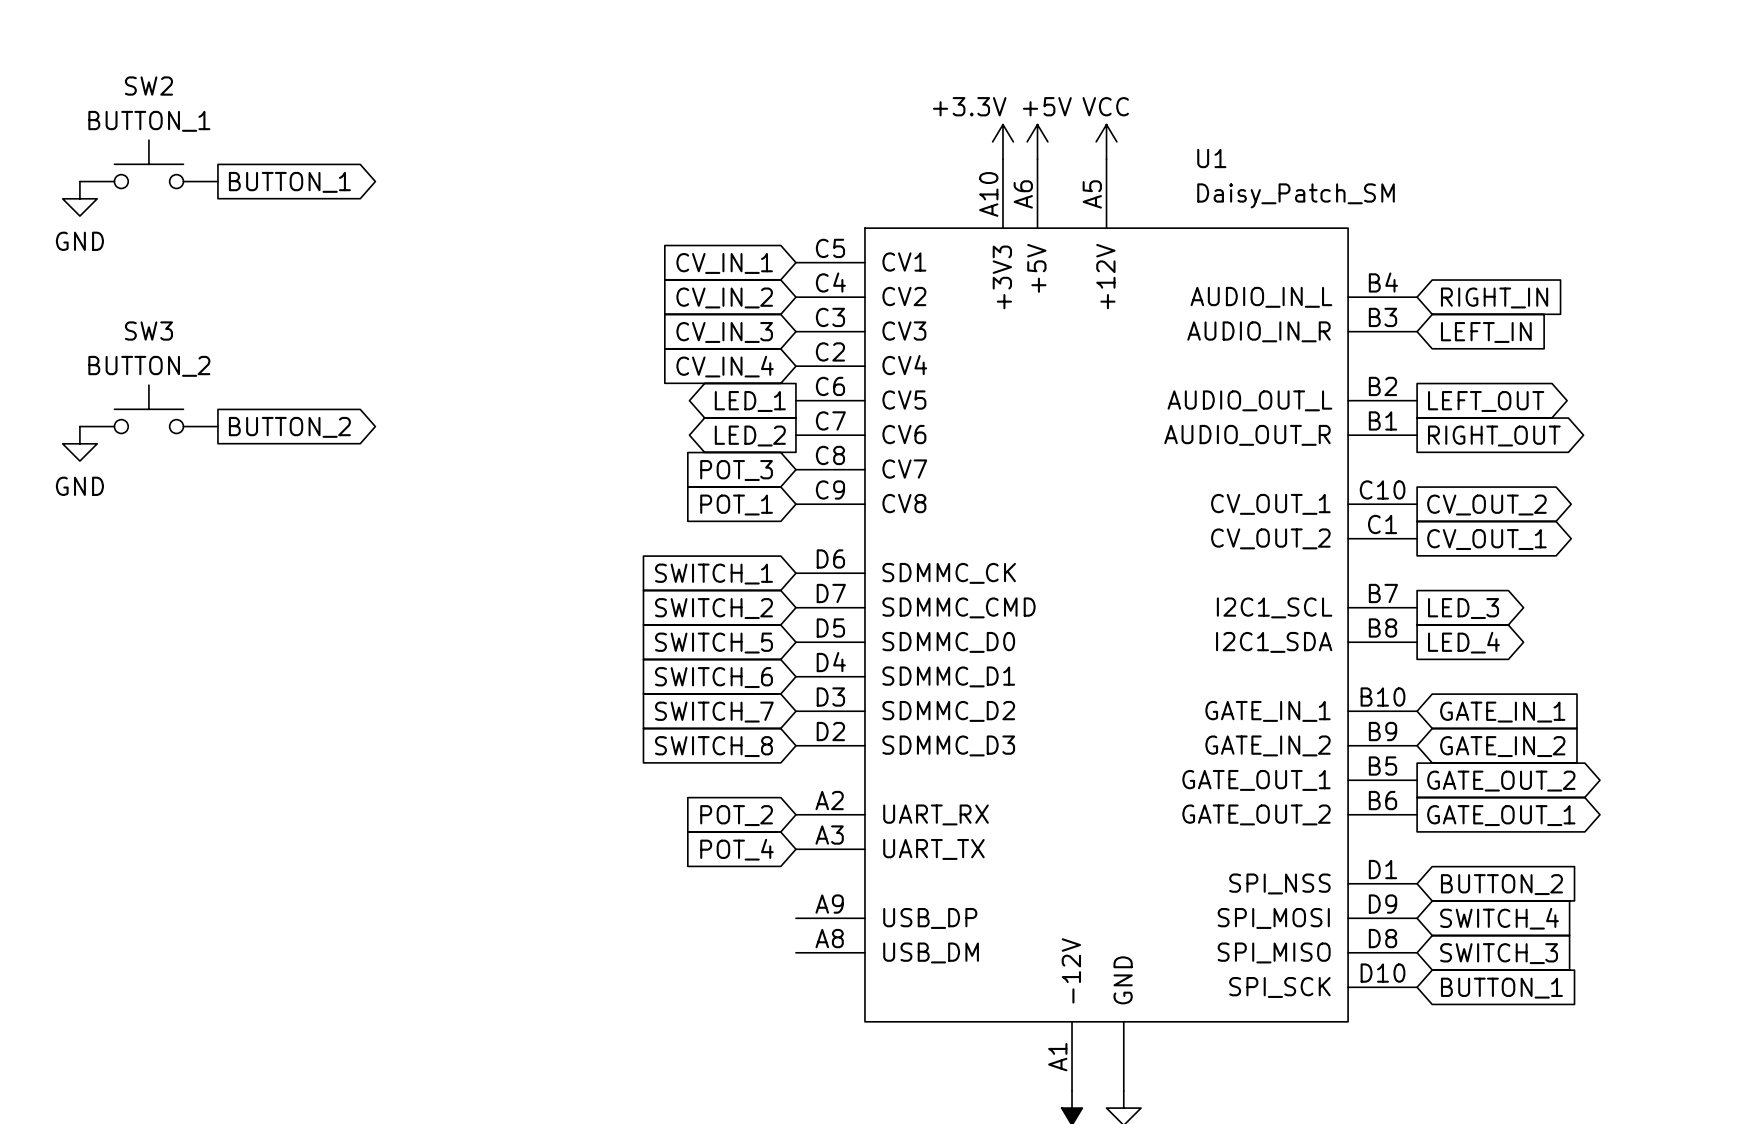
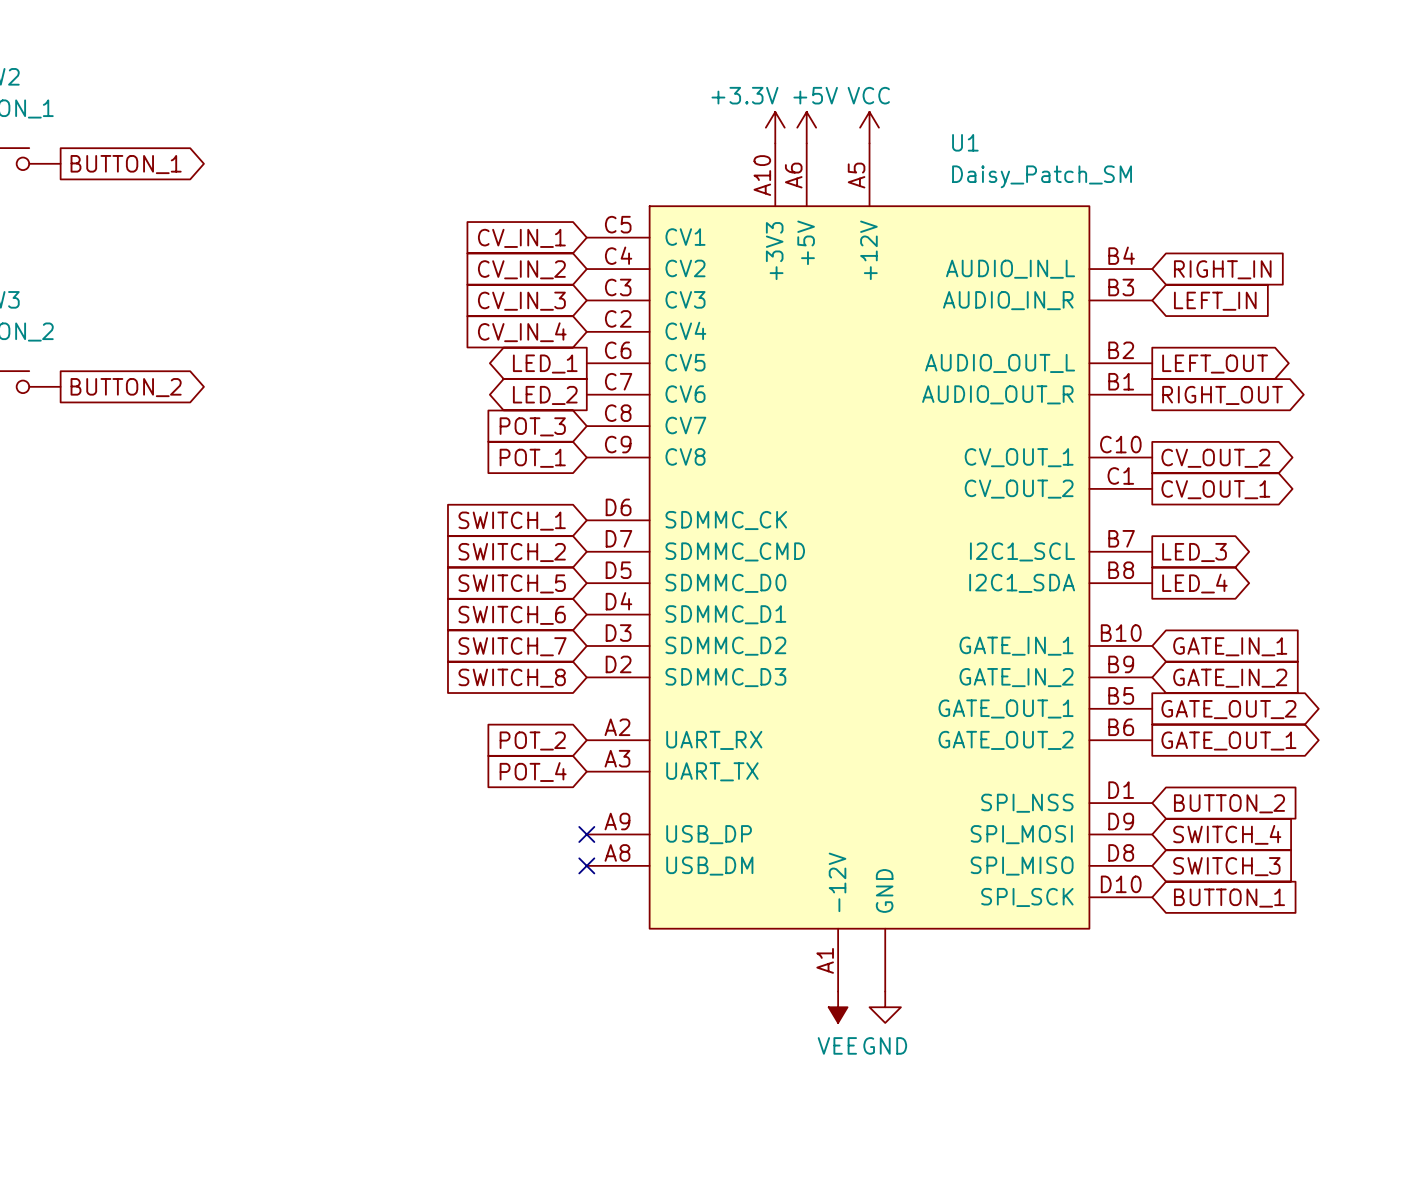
no-connect mark: none -> (586, 834)
no-connect mark: none -> (586, 865)

